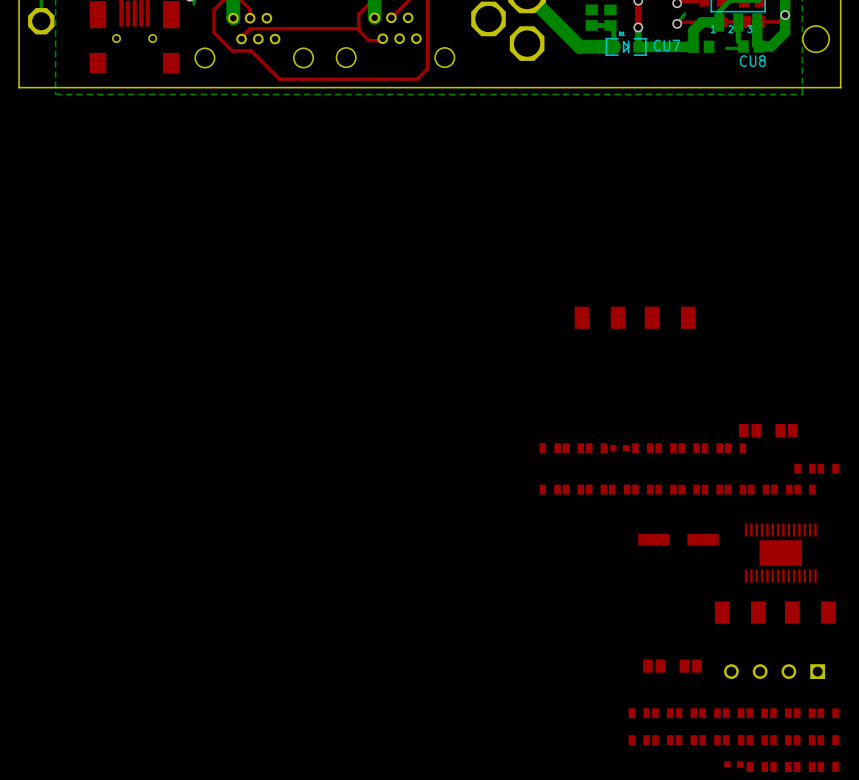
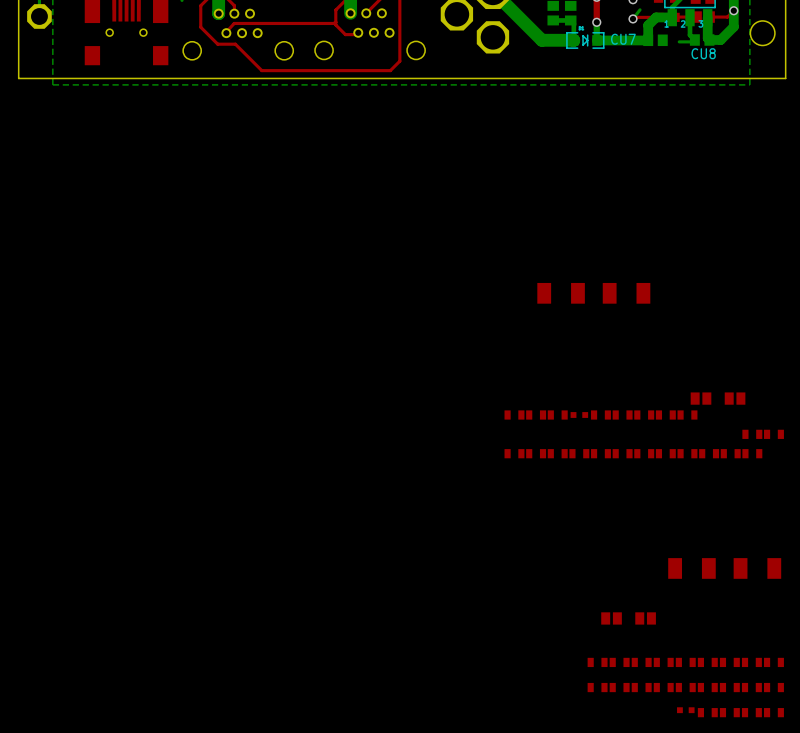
part: (678, 539) -> none
part: (780, 552) -> none
part: (774, 671) -> none

